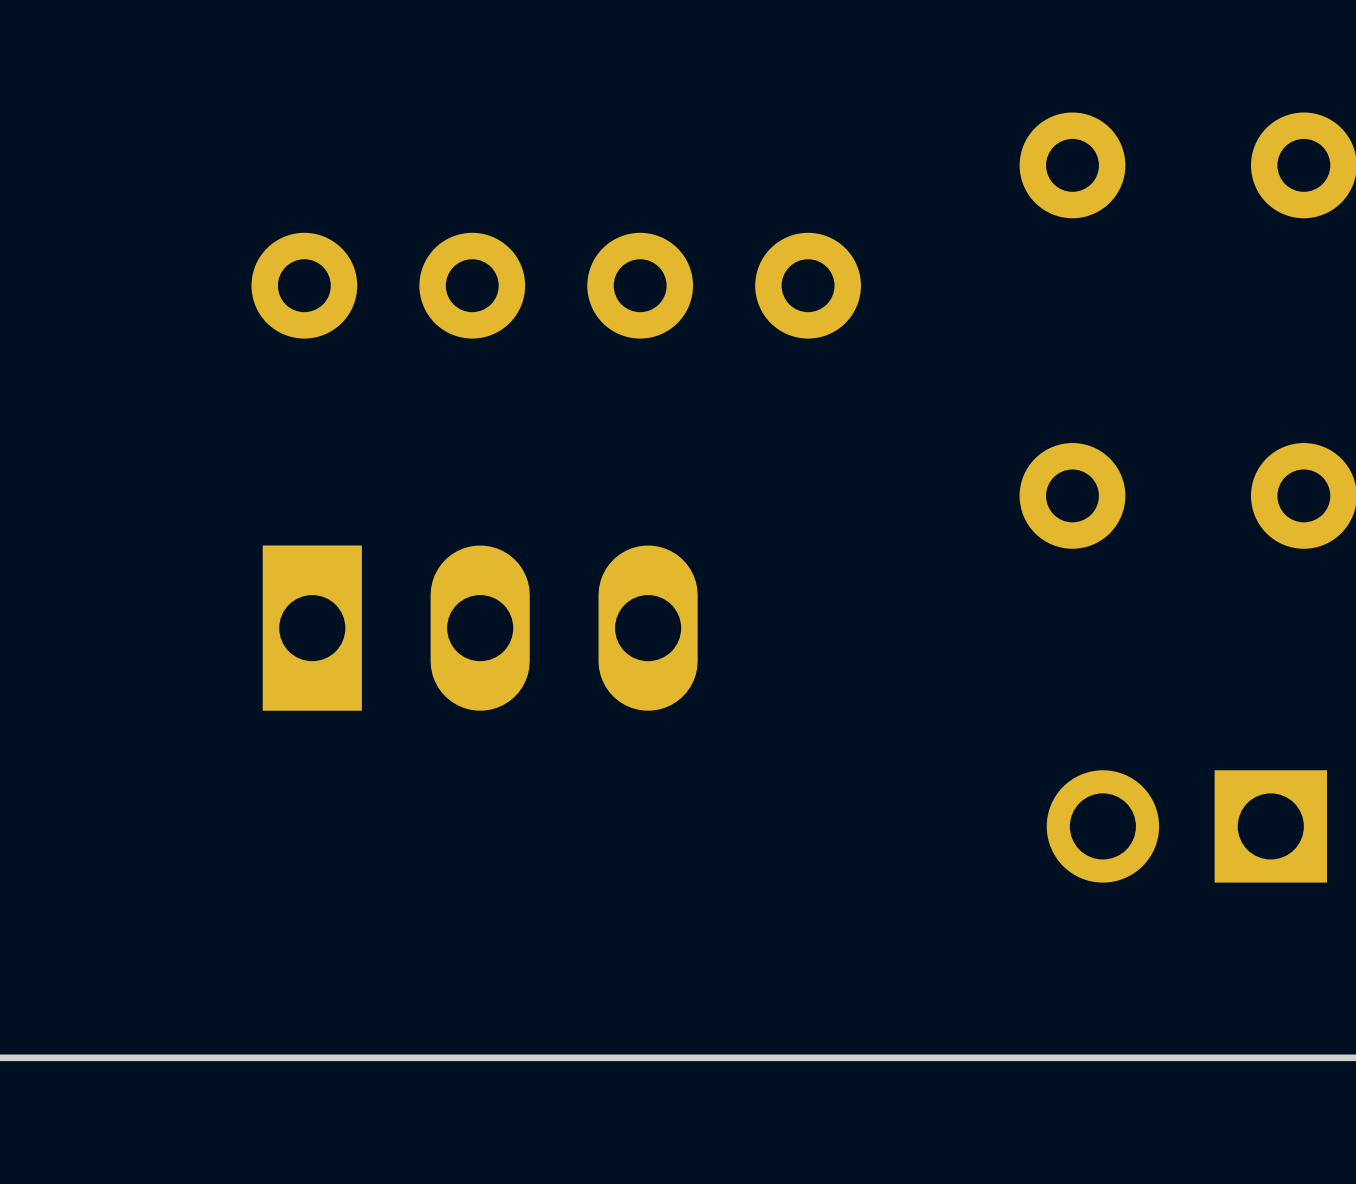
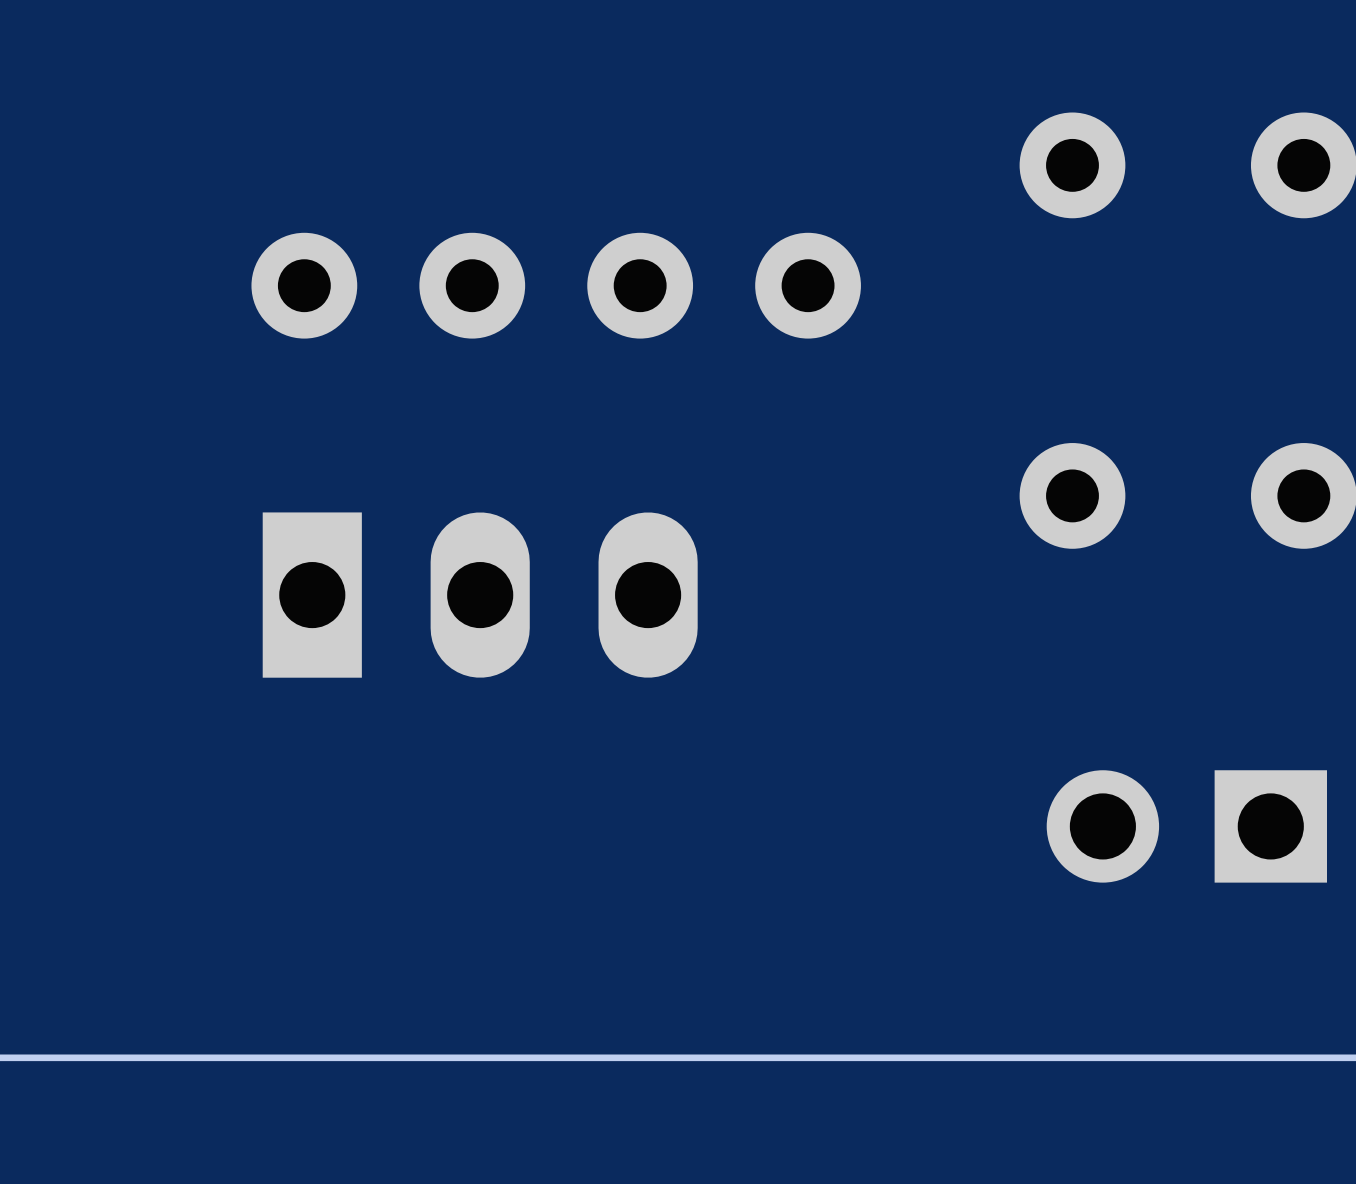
part position: (480, 628) -> (480, 595)

